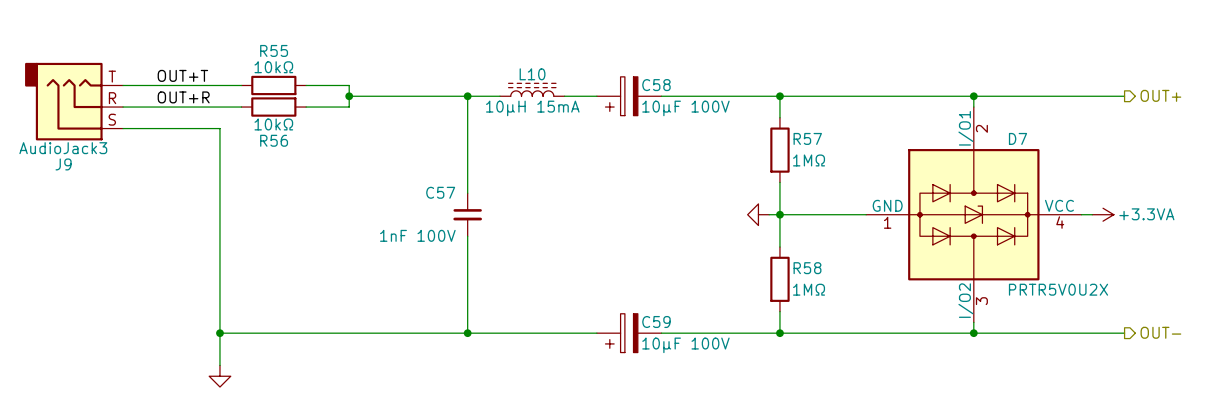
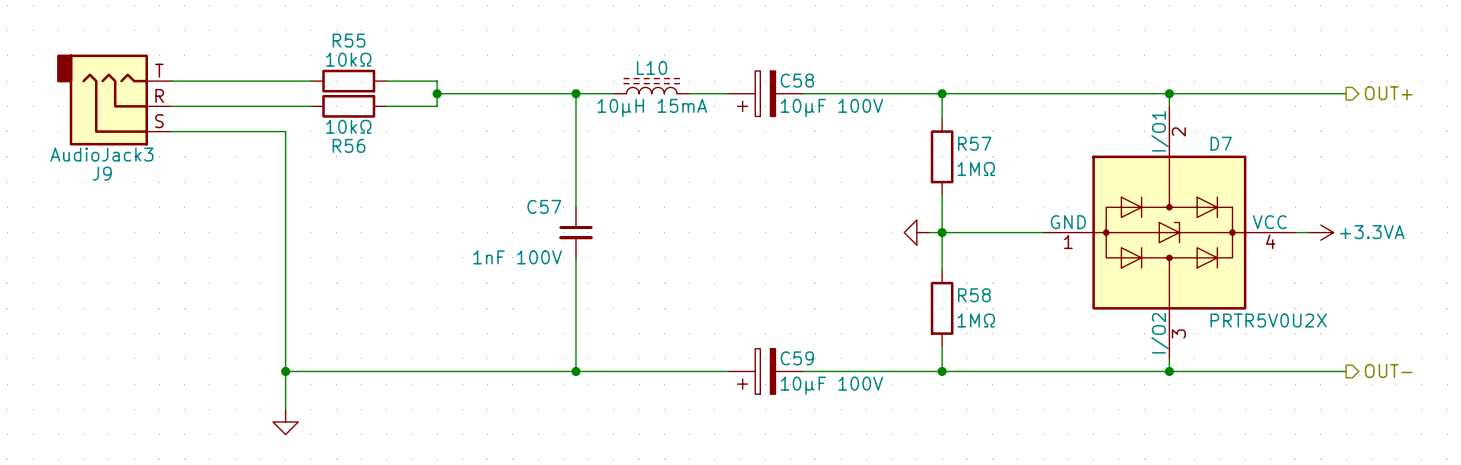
label: OUT+T (182, 75) -> none
label: OUT+R (183, 97) -> none

